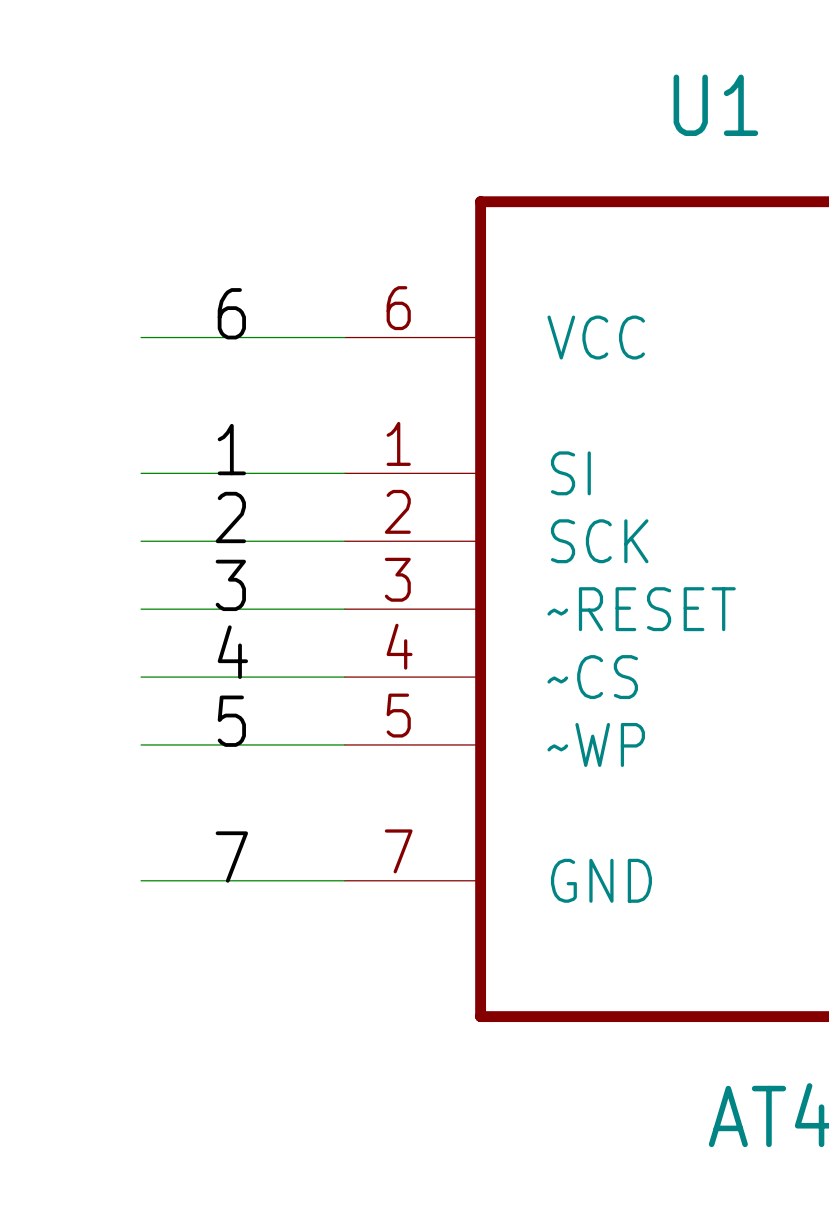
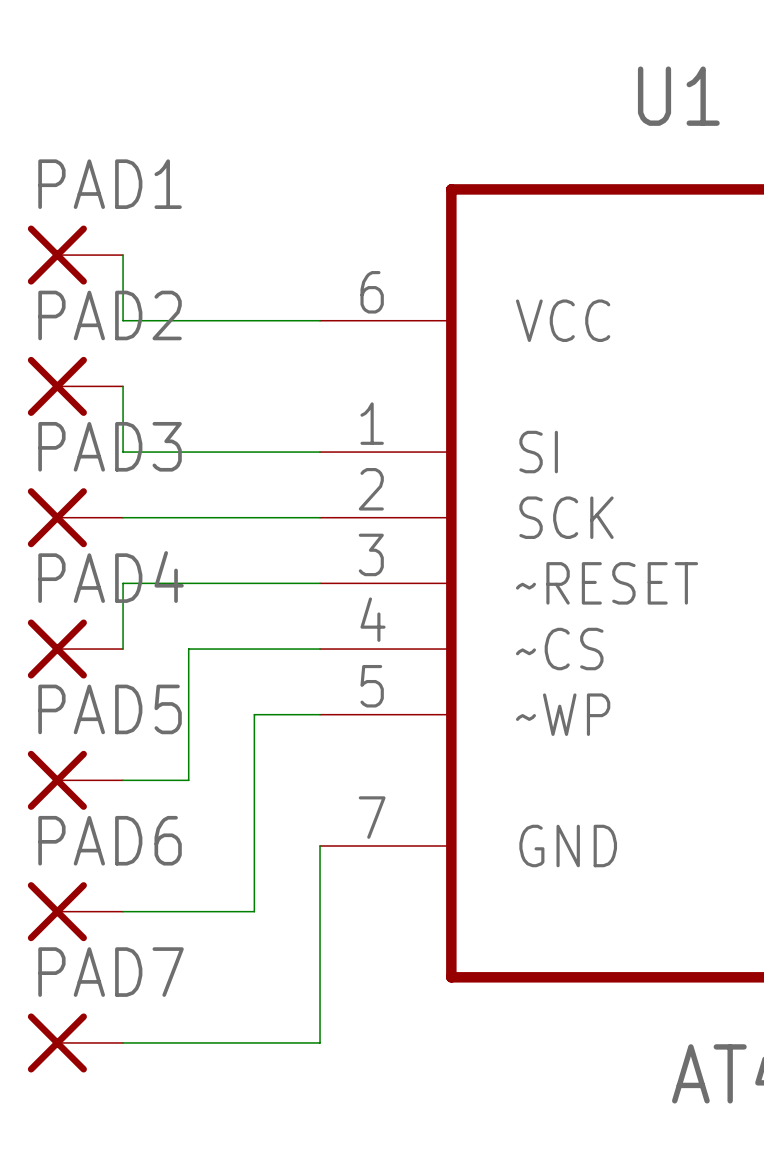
PAD1: none -> (75, 255)
wire: none -> (123, 255) (123, 320)
label: 6 (231, 313) -> none
PAD2: none -> (75, 386)
wire: none -> (123, 386) (123, 452)
label: 1 (231, 449) -> none
label: 2 (230, 517) -> none
PAD3: none -> (75, 517)
label: 3 (230, 585) -> none
label: 4 (232, 652) -> none
PAD4: none -> (75, 649)
wire: (141, 677) (208, 677) -> (123, 649) (123, 583)
wire: none -> (188, 649) (188, 780) (123, 780)
label: 5 (231, 721) -> none
wire: (141, 744) (276, 744) -> (123, 911) (254, 911) (254, 714)
PAD5: none -> (75, 780)
label: 7 (231, 857) -> none
wire: (141, 880) (344, 880) -> (123, 1042) (320, 1042) (320, 846)
PAD6: none -> (75, 911)
PAD7: none -> (75, 1042)

